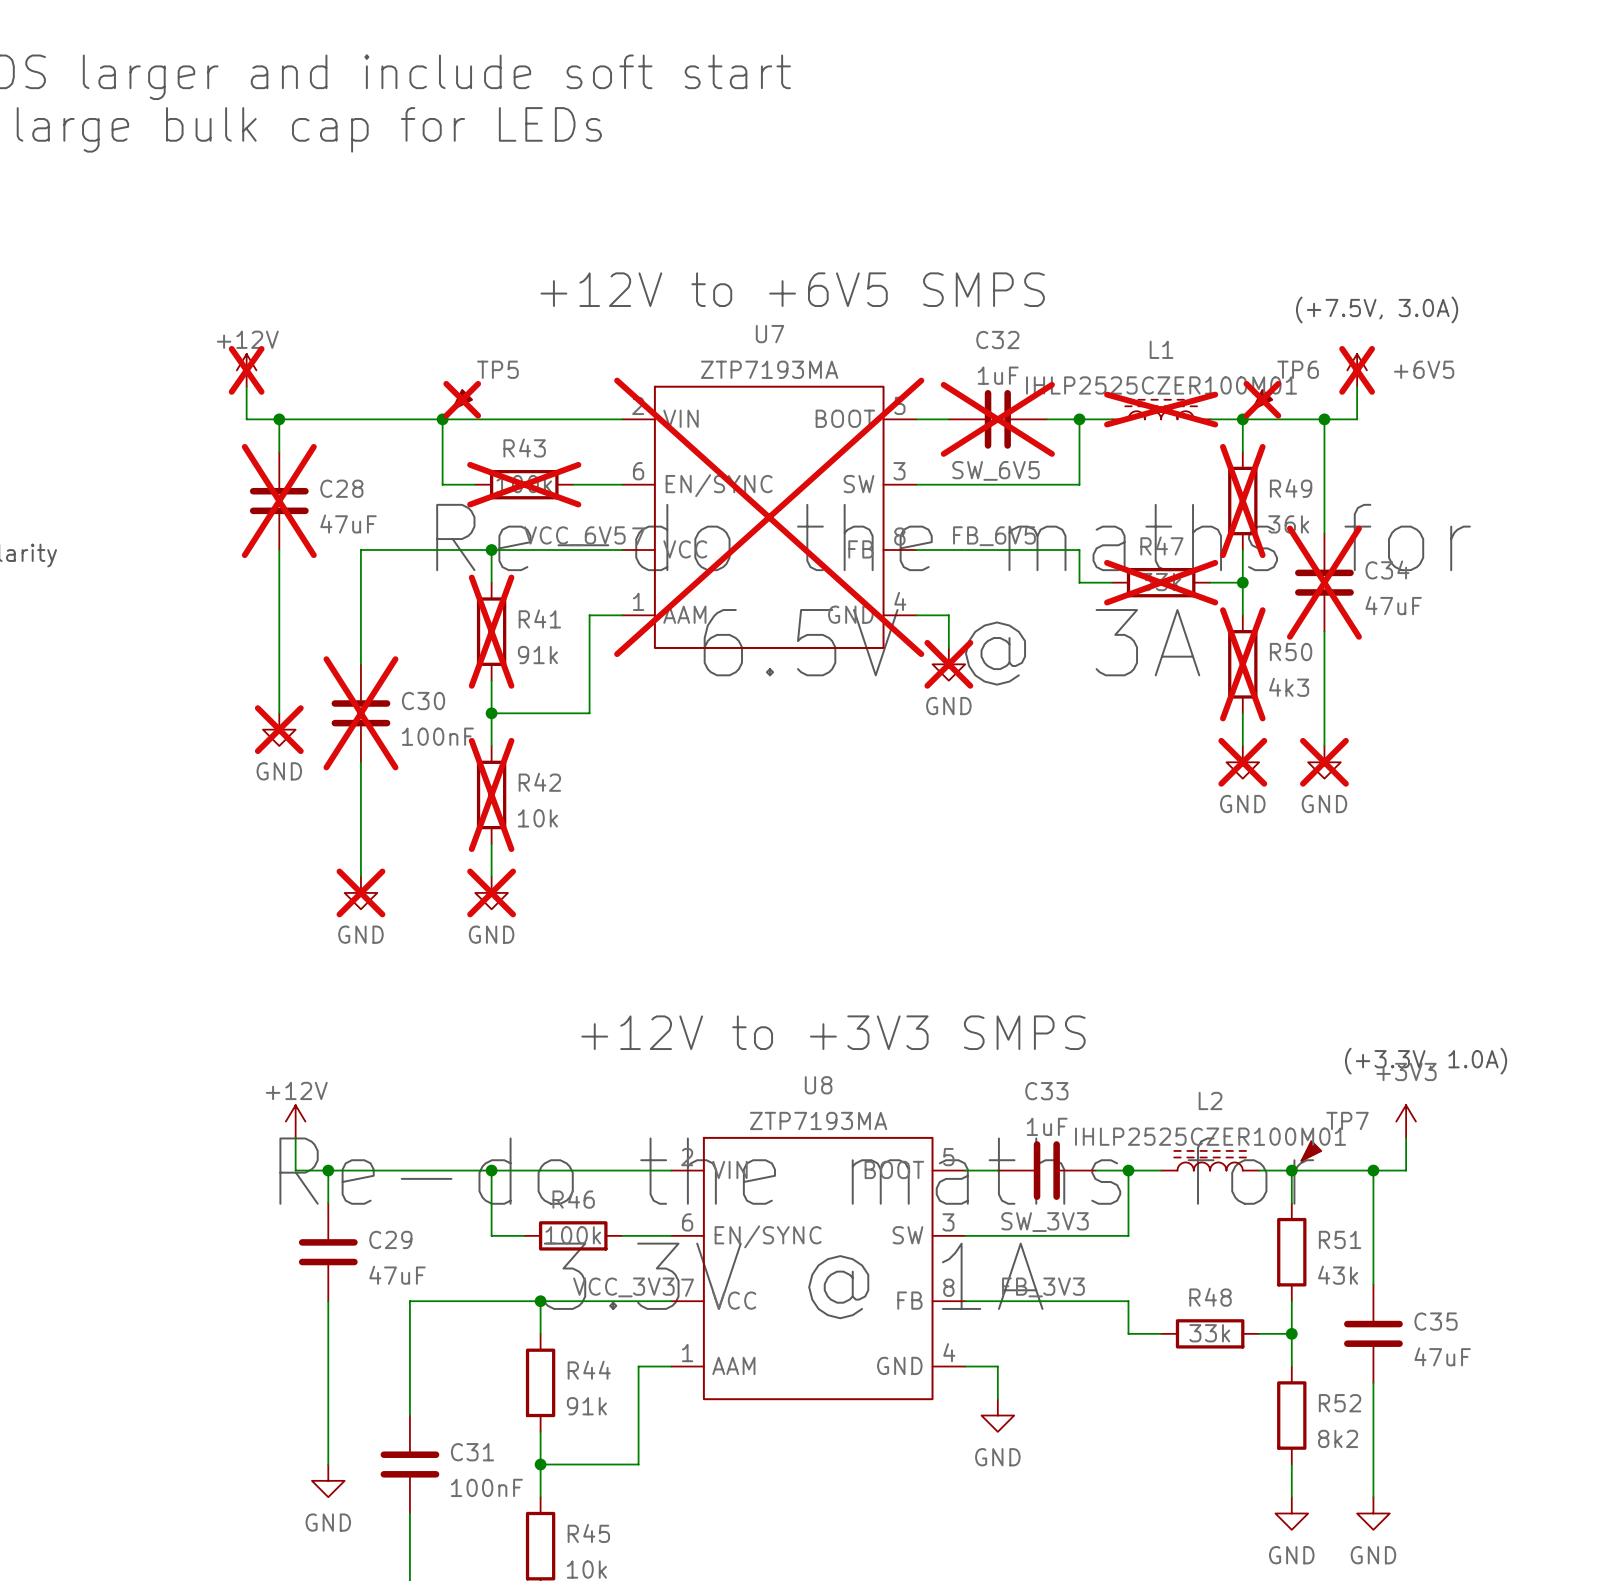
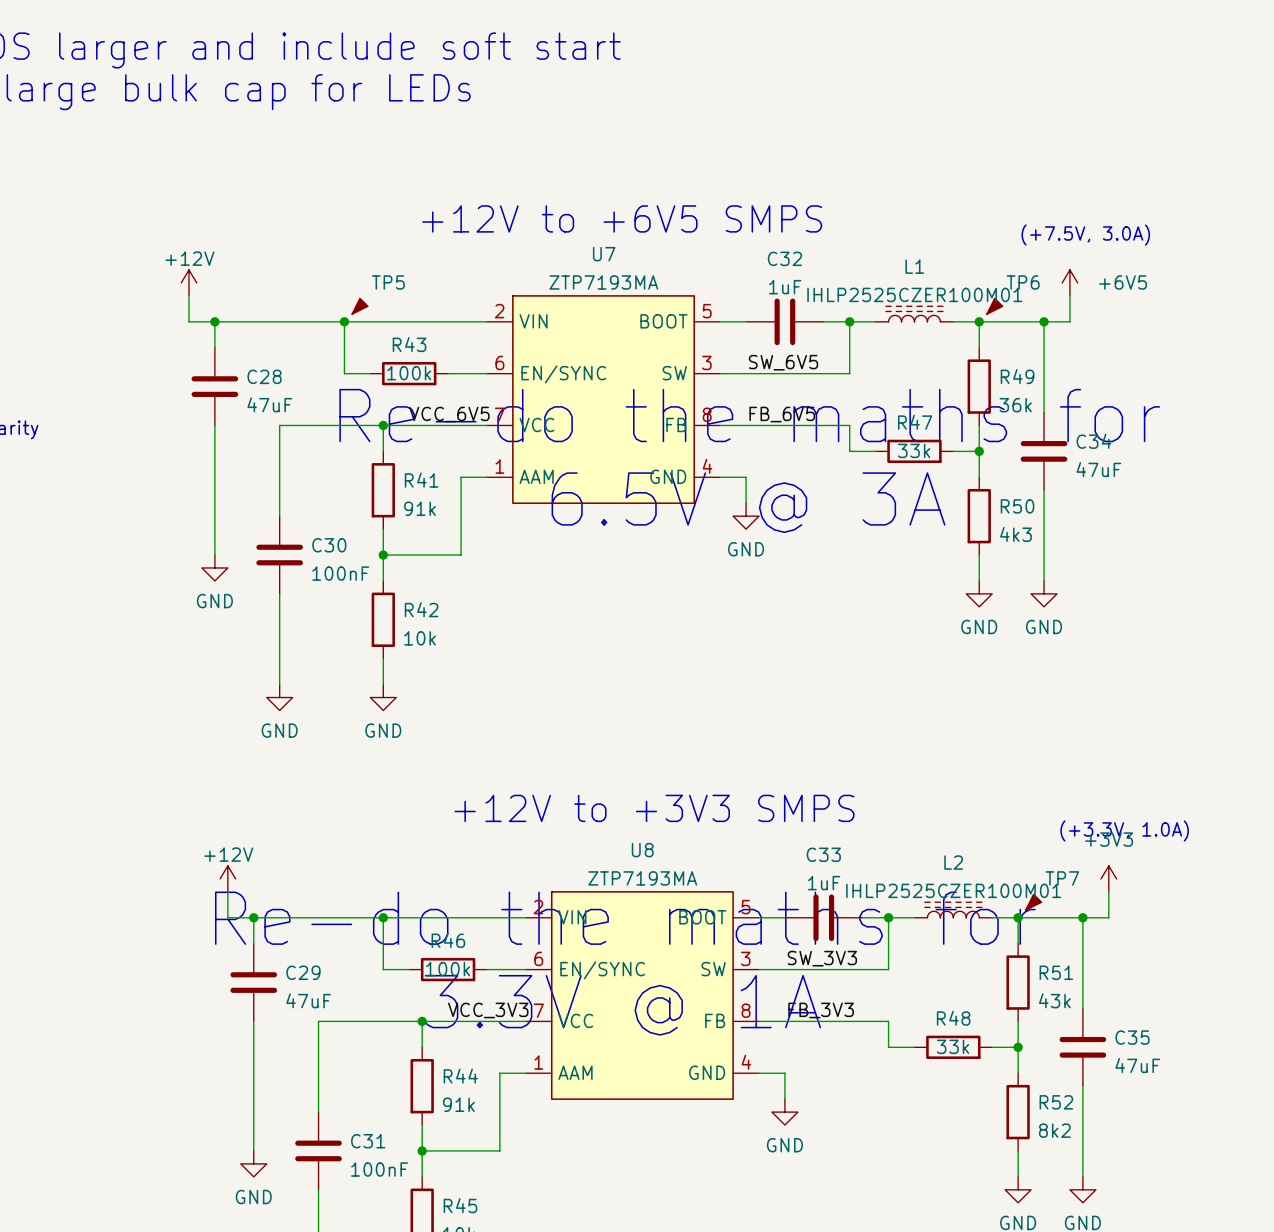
power symbol do-not-place cross: (246, 370) -> none
power symbol do-not-place cross: (1357, 370) -> none
TP5 do-not-place cross: (462, 399) -> none
TP6 do-not-place cross: (1262, 399) -> none
L1 do-not-place cross: (1161, 409) -> none
C32 do-not-place cross: (997, 419) -> none
R43 do-not-place cross: (524, 484) -> none
C28 do-not-place cross: (279, 501) -> none
R49 do-not-place cross: (1242, 501) -> none
U7 do-not-place cross: (769, 517) -> none
R47 do-not-place cross: (1161, 582) -> none
C34 do-not-place cross: (1324, 582) -> none
R41 do-not-place cross: (491, 631) -> none
power symbol do-not-place cross: (948, 664) -> none
R50 do-not-place cross: (1242, 664) -> none
C30 do-not-place cross: (360, 713) -> none
power symbol do-not-place cross: (279, 729) -> none
power symbol do-not-place cross: (1242, 762) -> none
power symbol do-not-place cross: (1324, 762) -> none
R42 do-not-place cross: (491, 794) -> none
power symbol do-not-place cross: (360, 892) -> none
power symbol do-not-place cross: (491, 892) -> none

